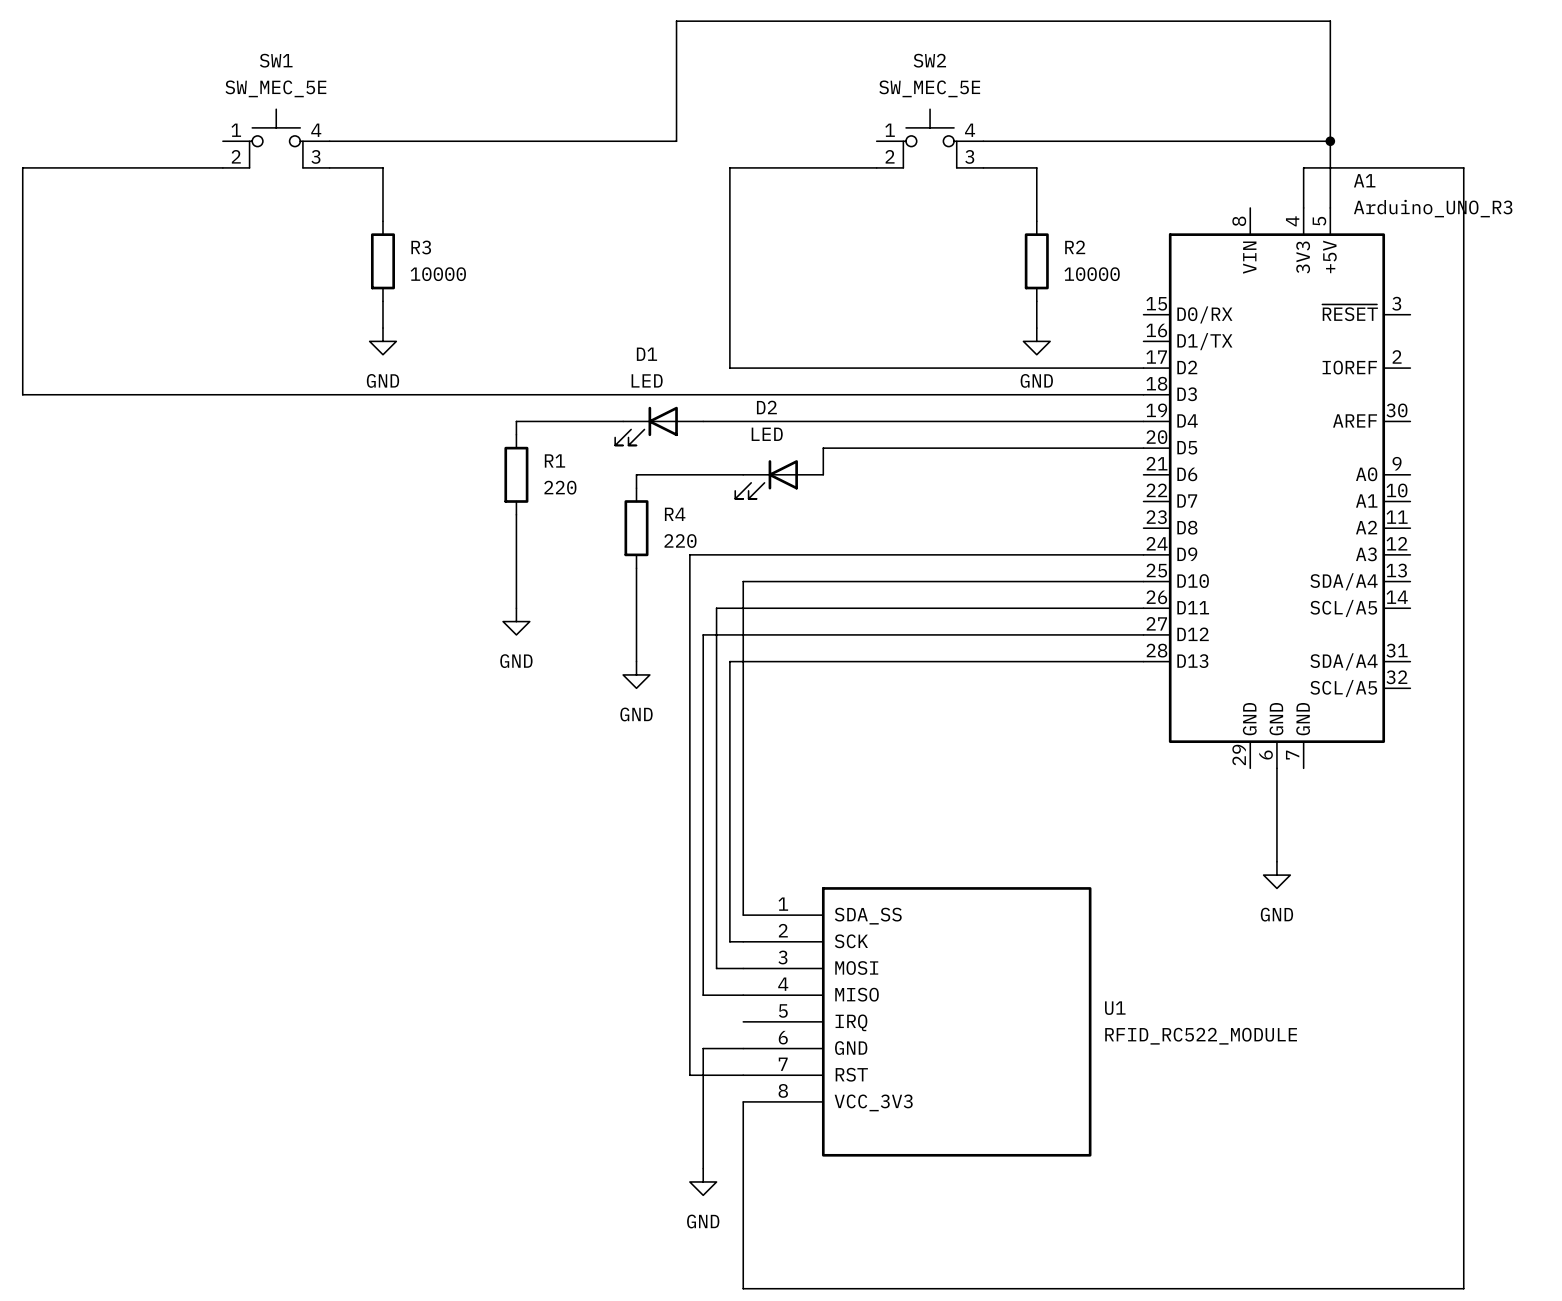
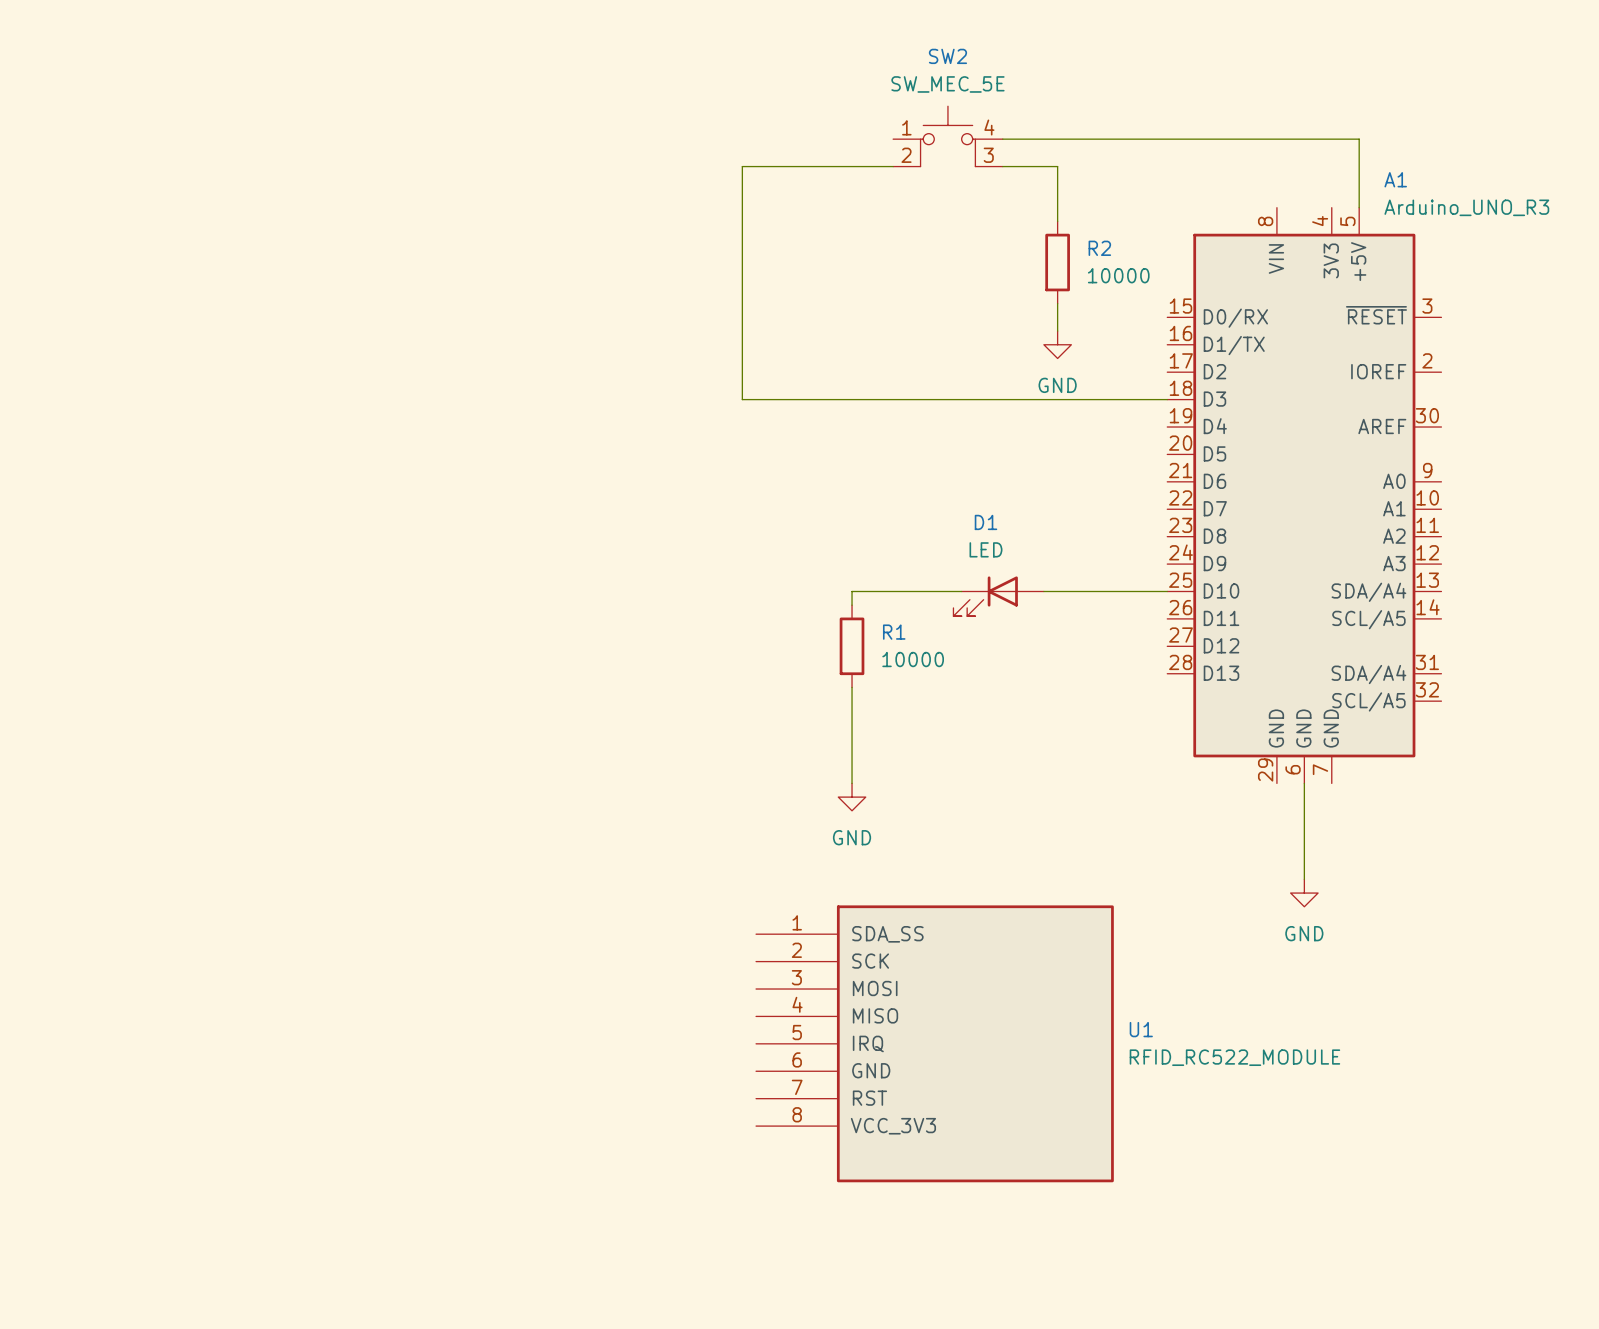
SW1: SW_MEC_5E (276, 138) -> none
wire: (329, 141) (676, 141) (676, 21) (1330, 21) (1330, 141) -> none
junction: (1330, 141) -> none
wire: (222, 167) (22, 167) (22, 394) (729, 394) -> none
wire: (329, 167) (382, 167) (382, 221) -> none
wire: (1303, 207) (1303, 167) (1463, 167) (1463, 1288) (743, 1288) (743, 1101) -> none
R3: 10000 (382, 261) -> none
wire: (382, 301) (382, 328) -> none
power symbol: GND (382, 341) -> none
wire: (729, 368) (1143, 368) -> (742, 372) (742, 399)
wire: (623, 421) (516, 421) (516, 434) -> none
wire: (703, 421) (1143, 421) -> none
D1 position: (659, 426) -> (998, 596)
wire: (1143, 448) (823, 448) (823, 474) -> none
R1 position: (516, 474) -> (852, 646)
wire: (743, 474) (636, 474) (636, 488) -> none
D2: LED (779, 479) -> none
R1 value: 220 (560, 487) -> 10000 (913, 659)
wire: (516, 514) (516, 608) -> none
R4: 220 (636, 528) -> none
wire: (1143, 554) (689, 554) (689, 1075) (743, 1075) -> none
wire: (636, 568) (636, 661) -> (852, 687) (852, 783)
wire: (836, 581) (743, 581) (743, 915) -> (852, 591) (852, 605)
wire: (1143, 608) (716, 608) (716, 968) (743, 968) -> none
power symbol: GND (516, 621) -> none
wire: (1143, 634) (703, 634) (703, 995) (743, 995) -> none
wire: (1143, 661) (729, 661) (729, 941) (743, 941) -> none
power symbol: GND (636, 674) -> none
power symbol: none -> GND (852, 797)
wire: (743, 1048) (703, 1048) (703, 1168) -> none
power symbol: GND (703, 1181) -> none

